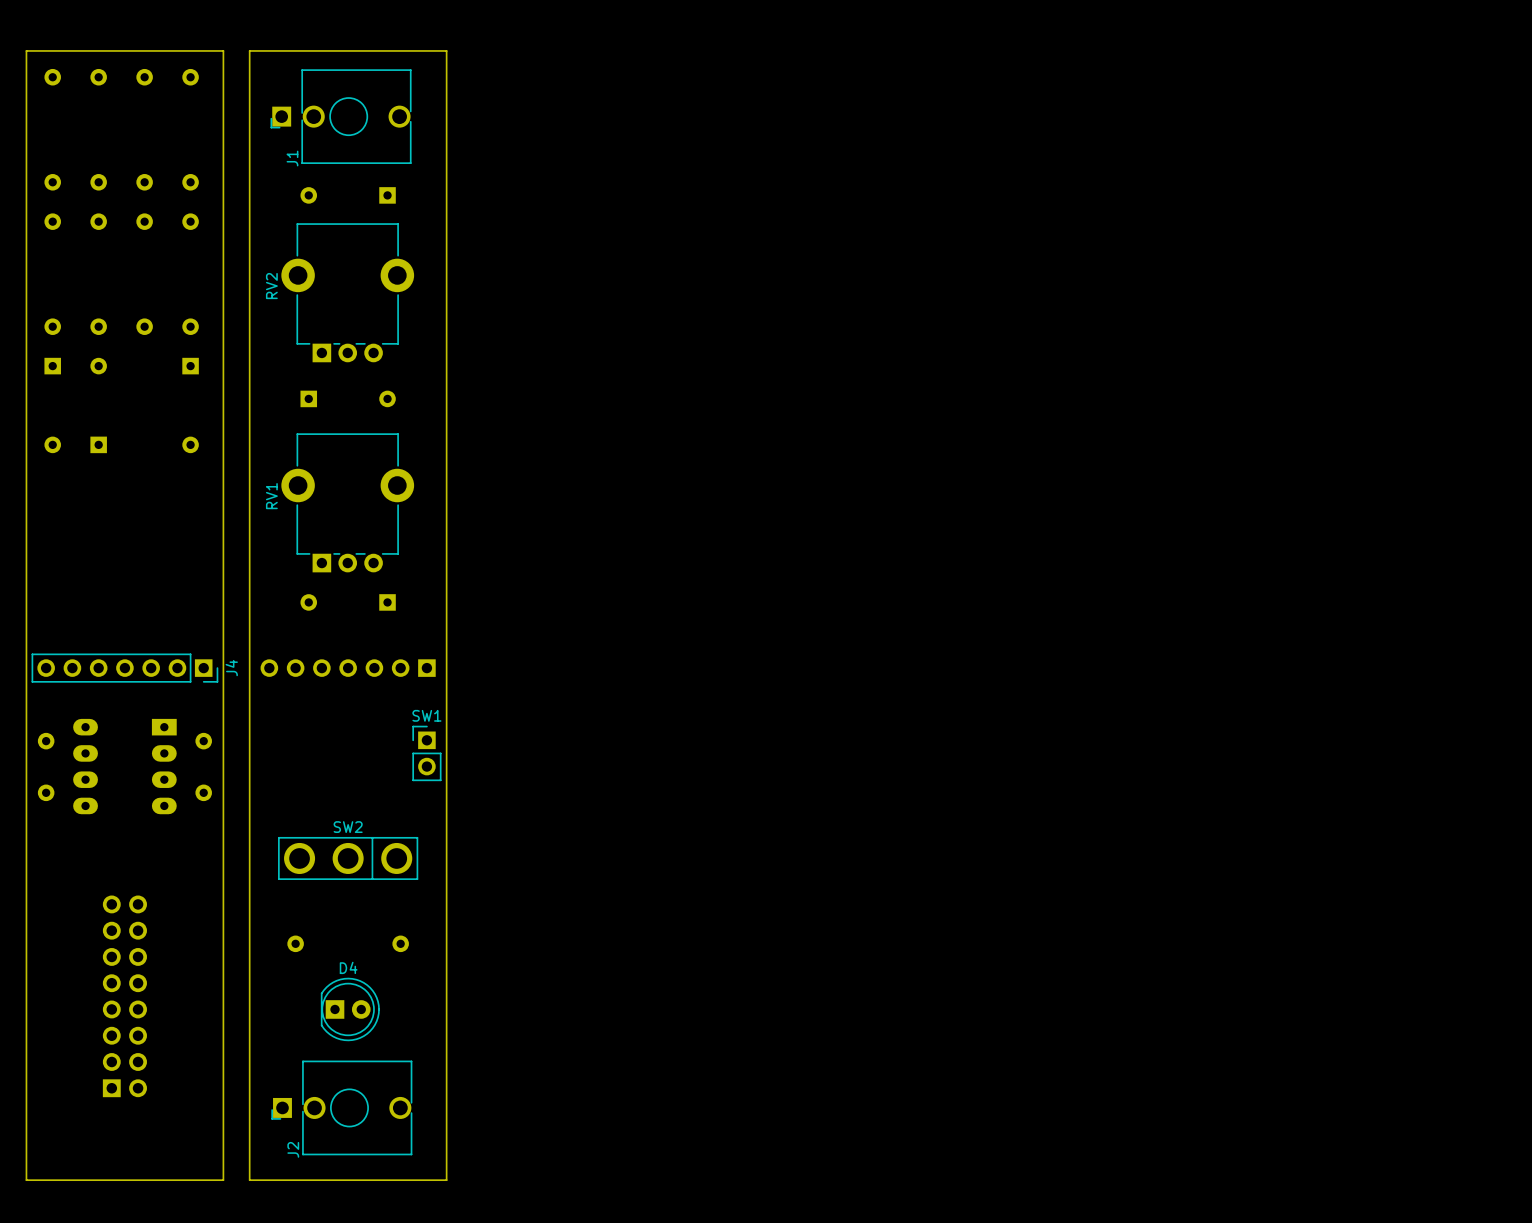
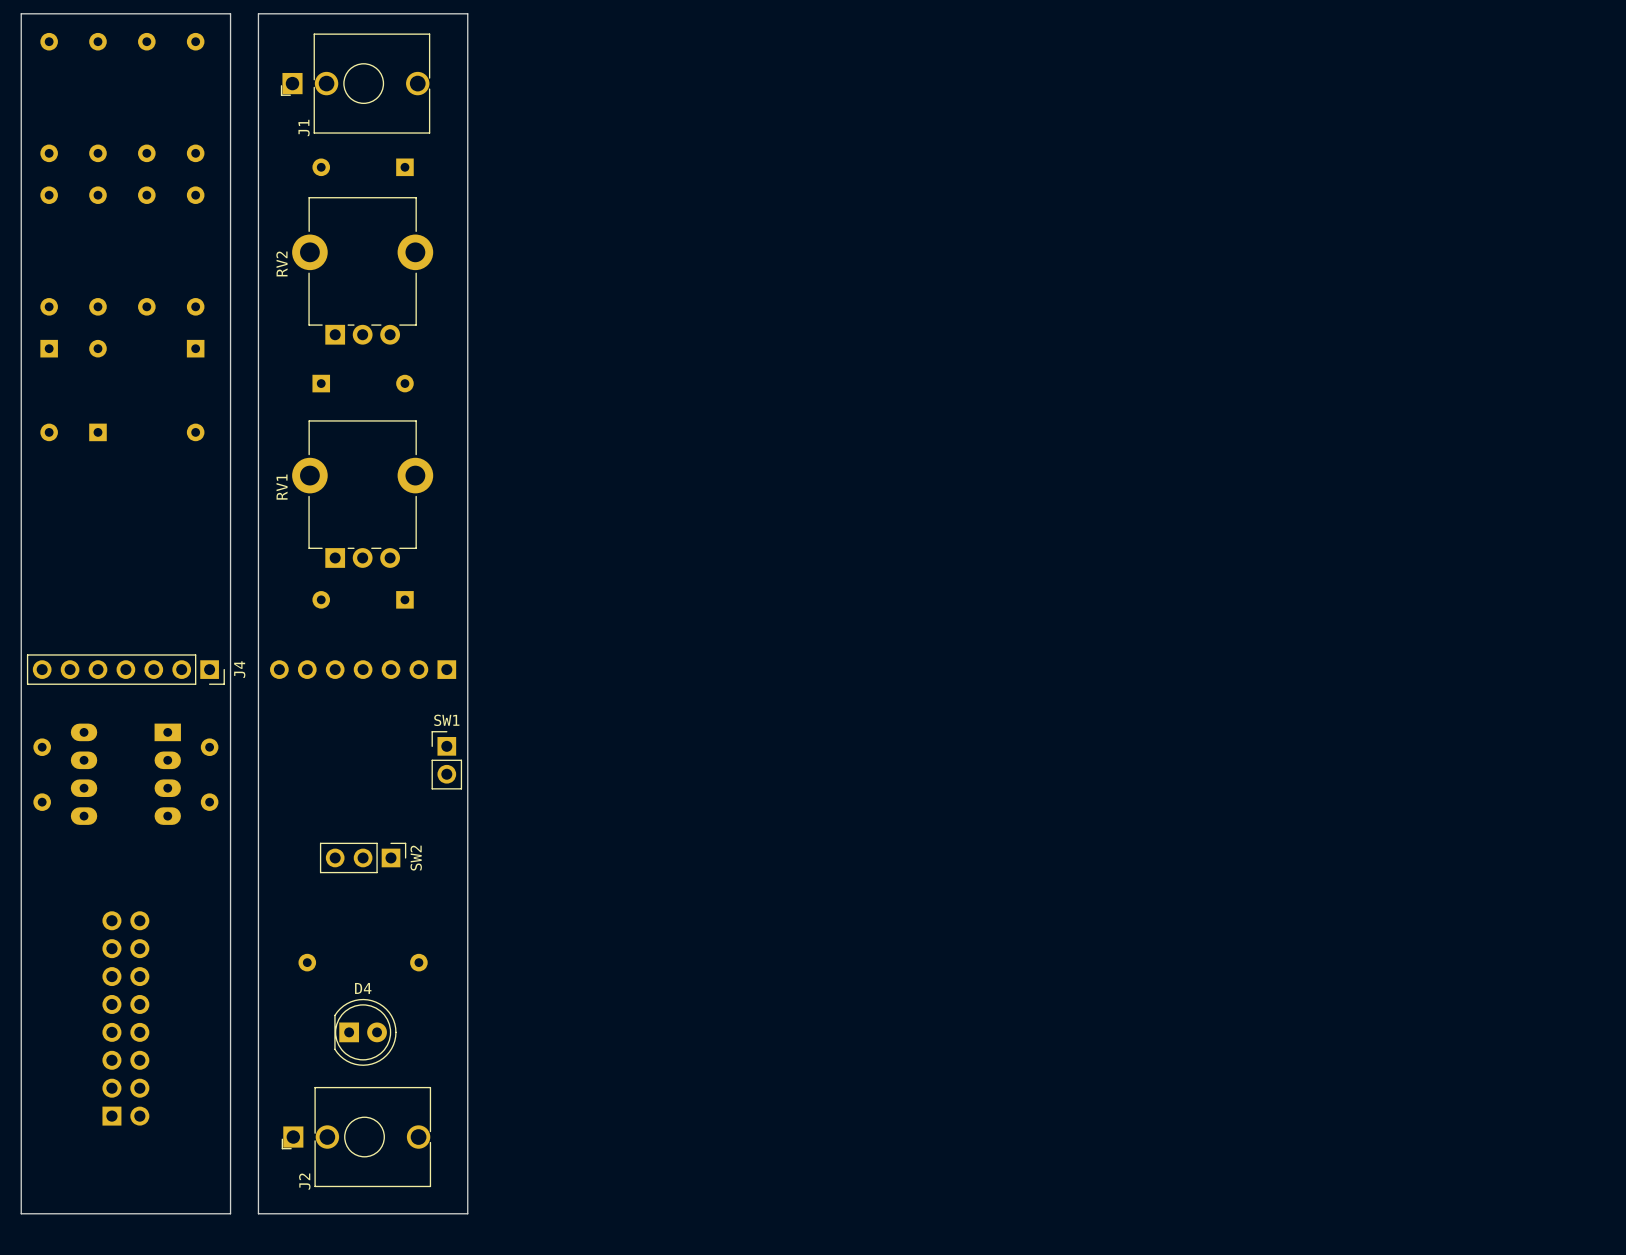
SW2 name position: SW2 (348, 827) -> SW2 (416, 858)
SW2 footprint: [278, 837, 419, 880] -> [319, 842, 407, 874]

